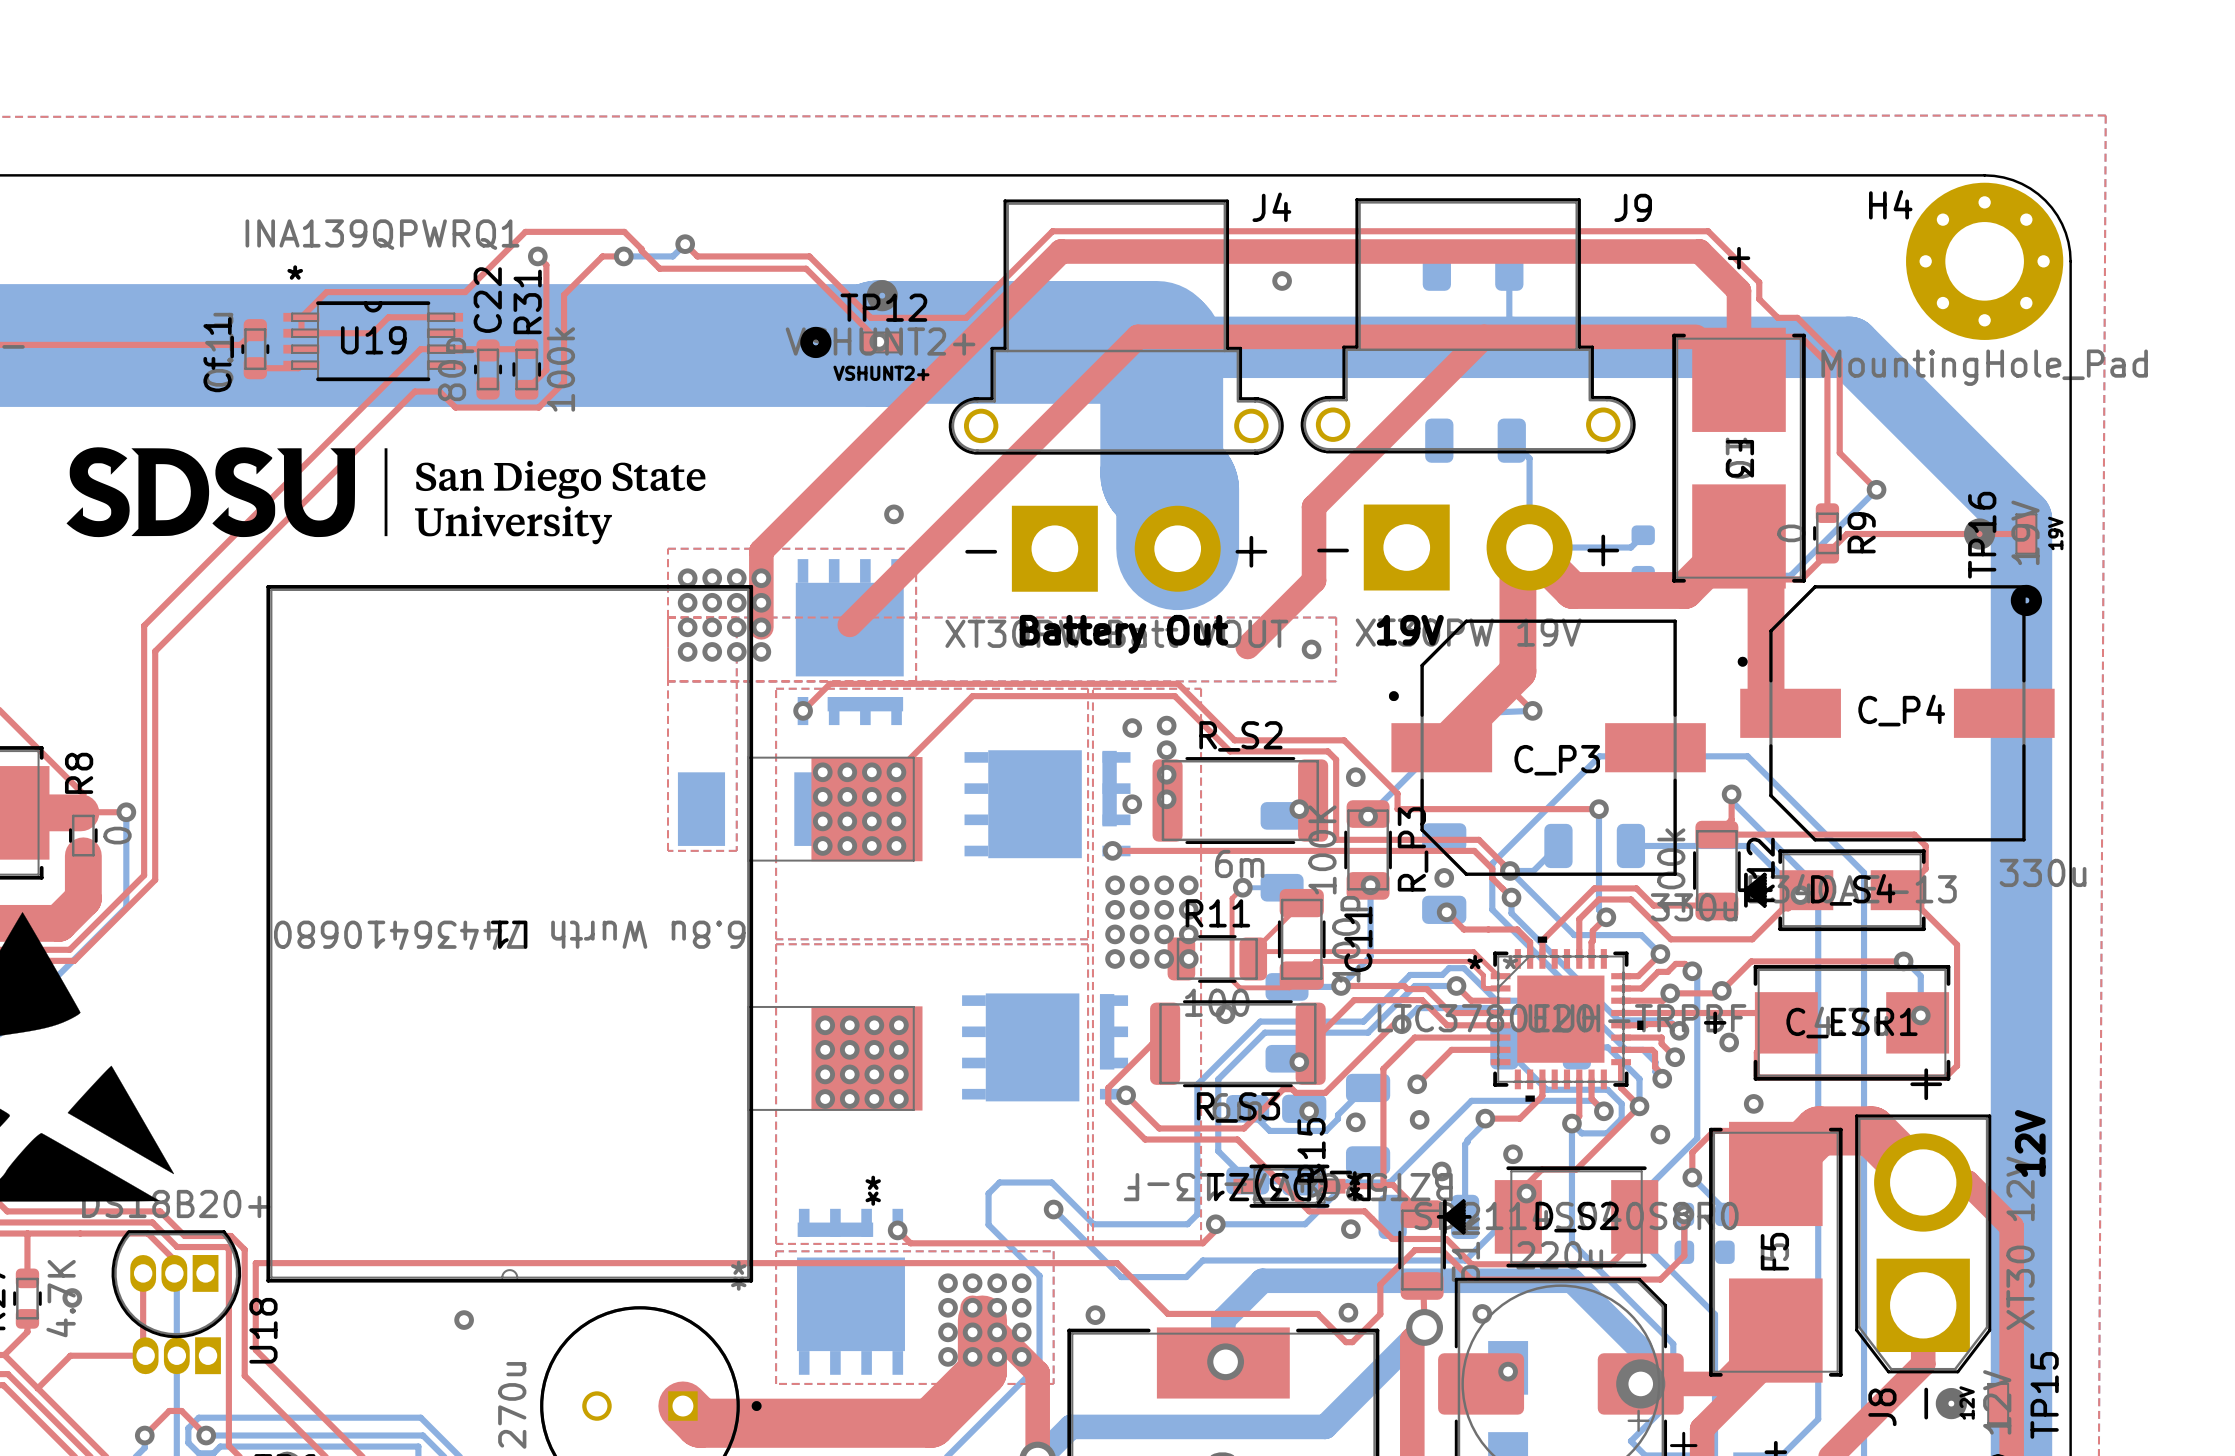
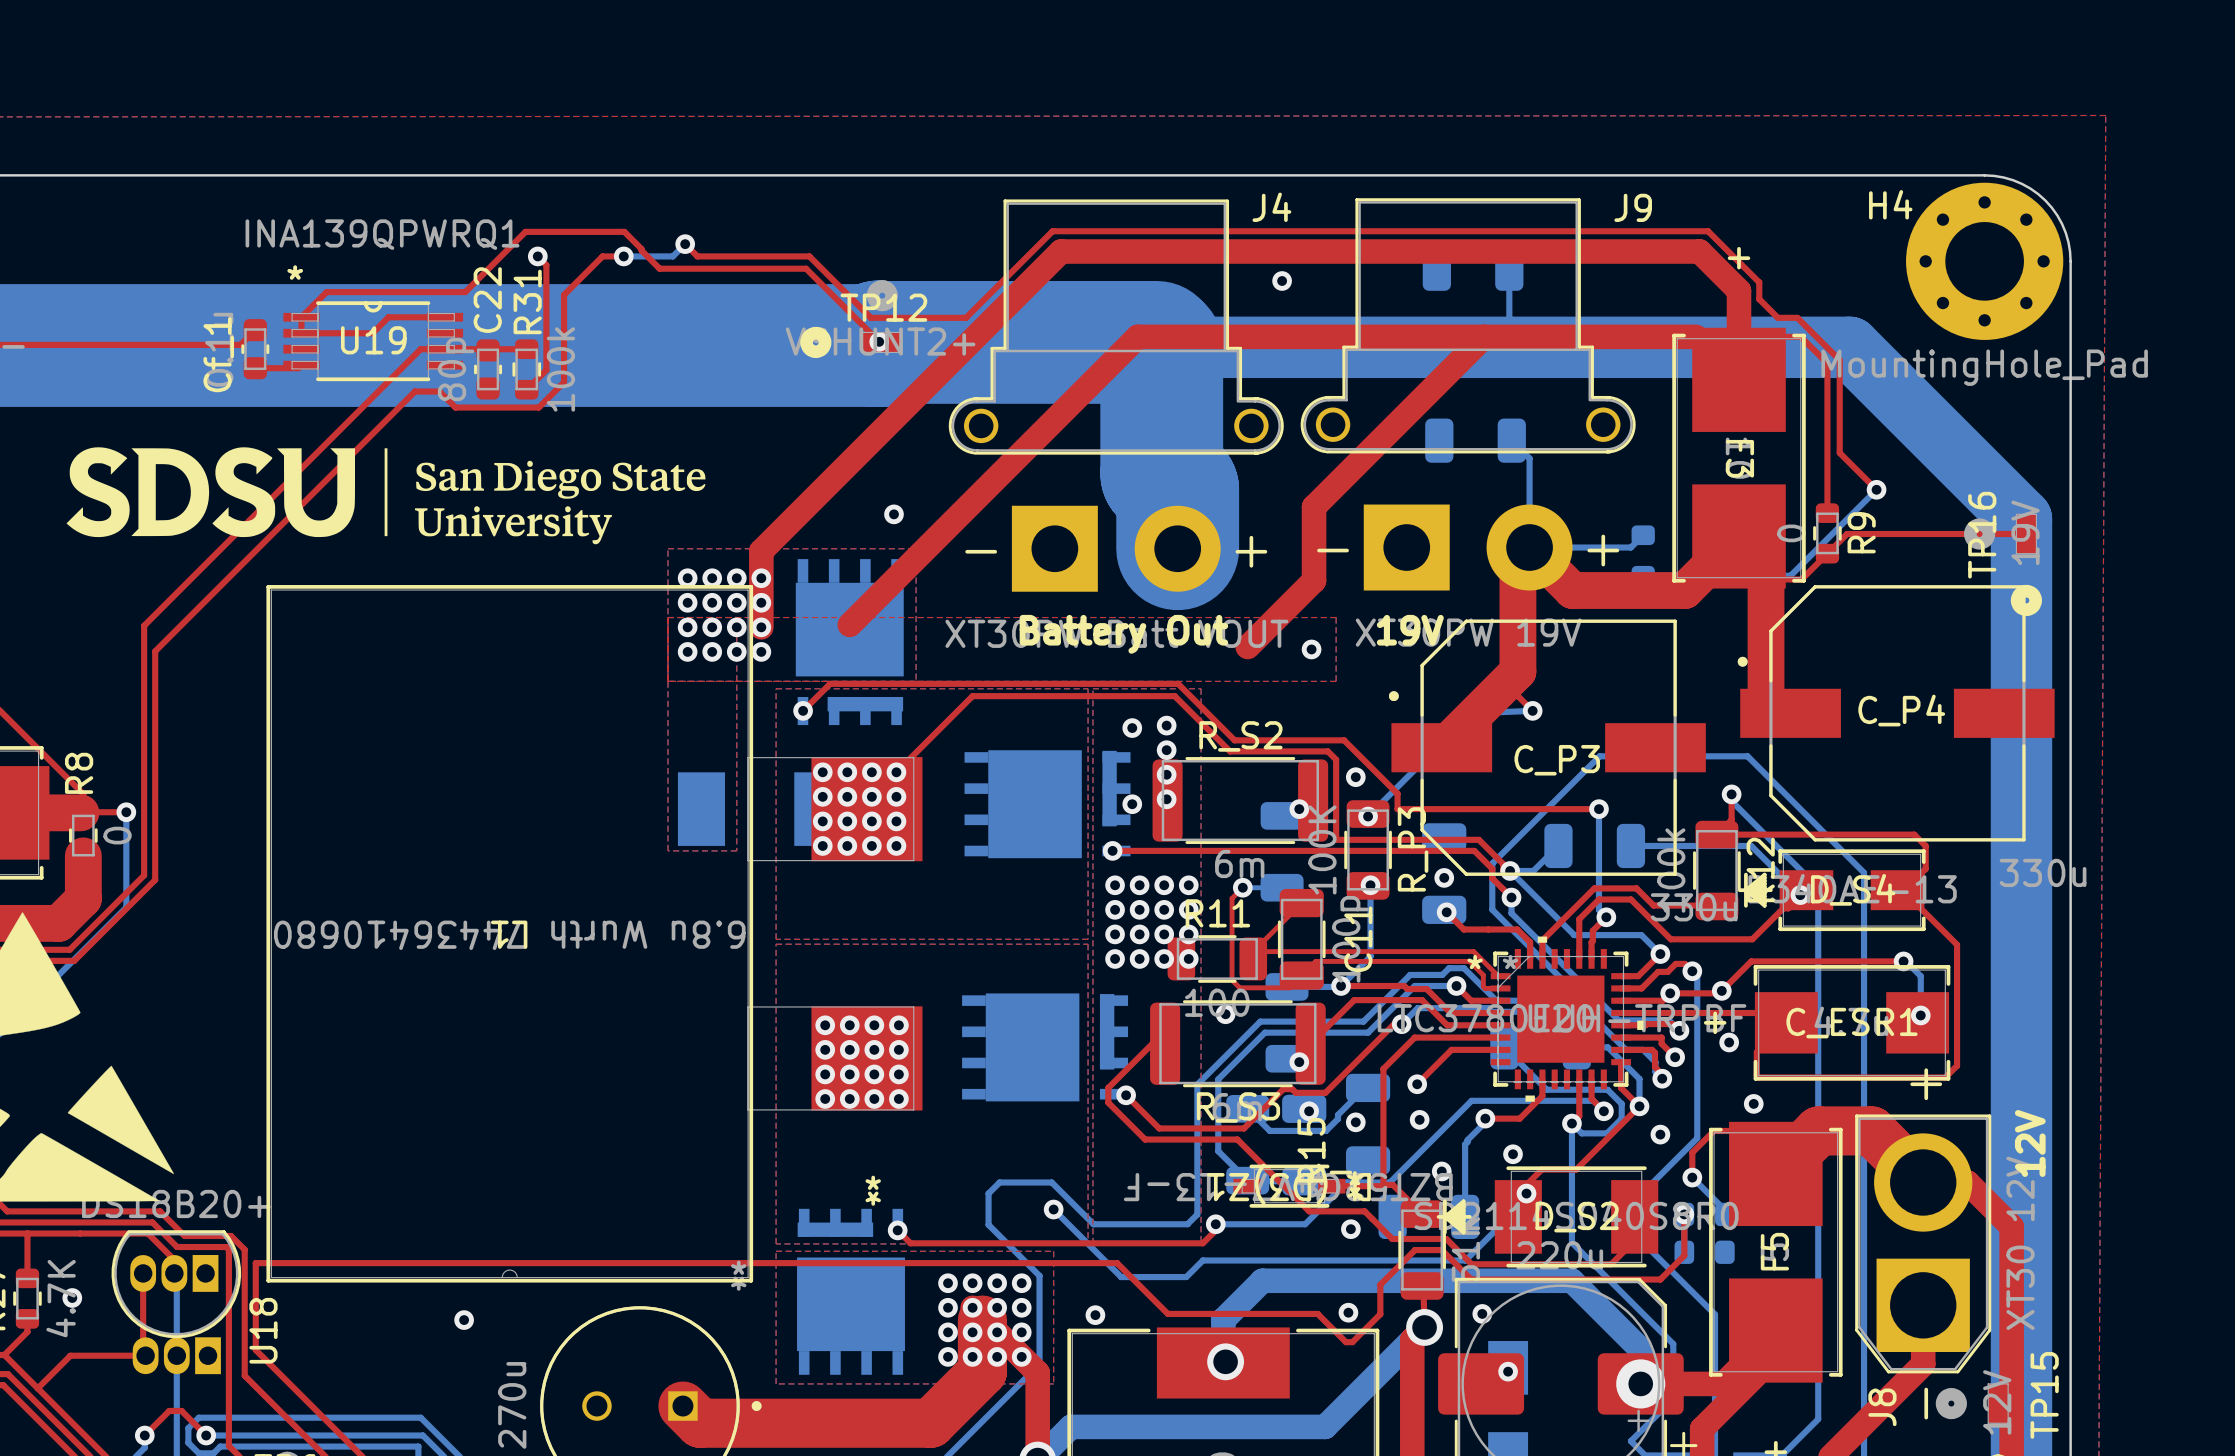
TP12 text: VSHUNT2+ (881, 373) -> none
TP16 text: 19V (2055, 533) -> none
TP15 text: 12V (1967, 1403) -> none

